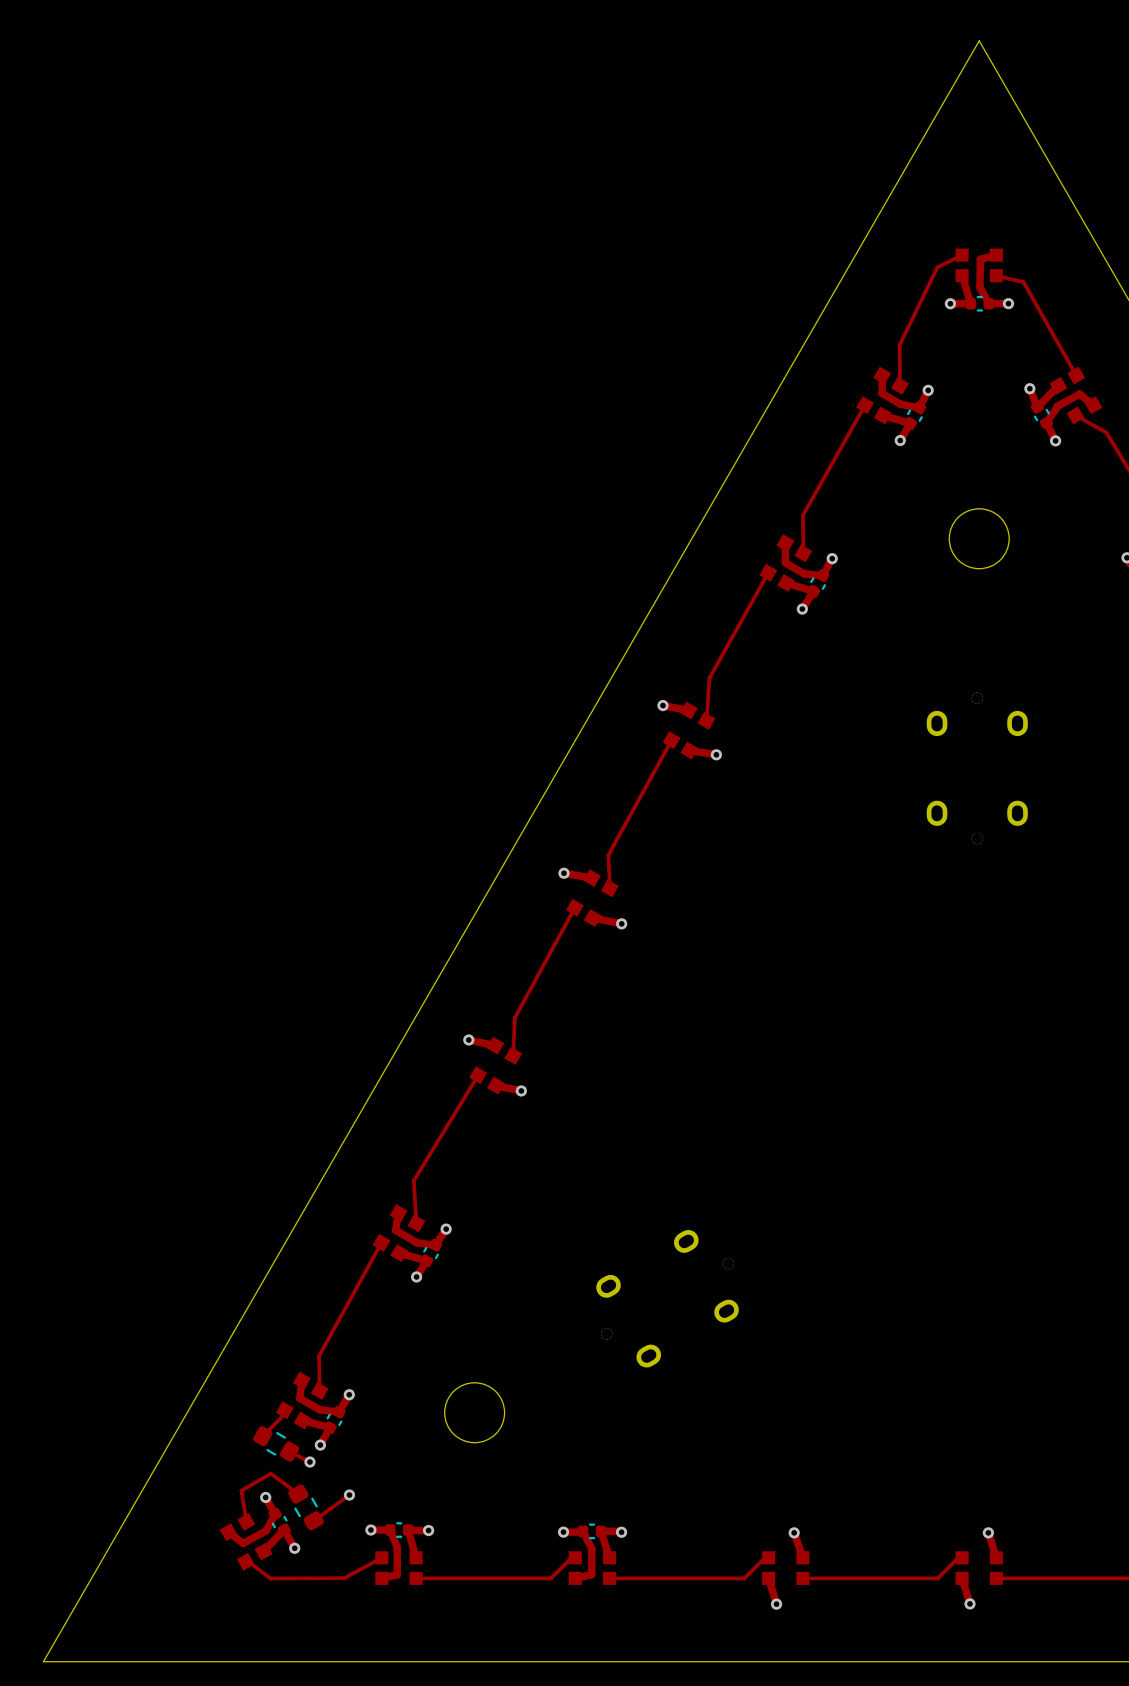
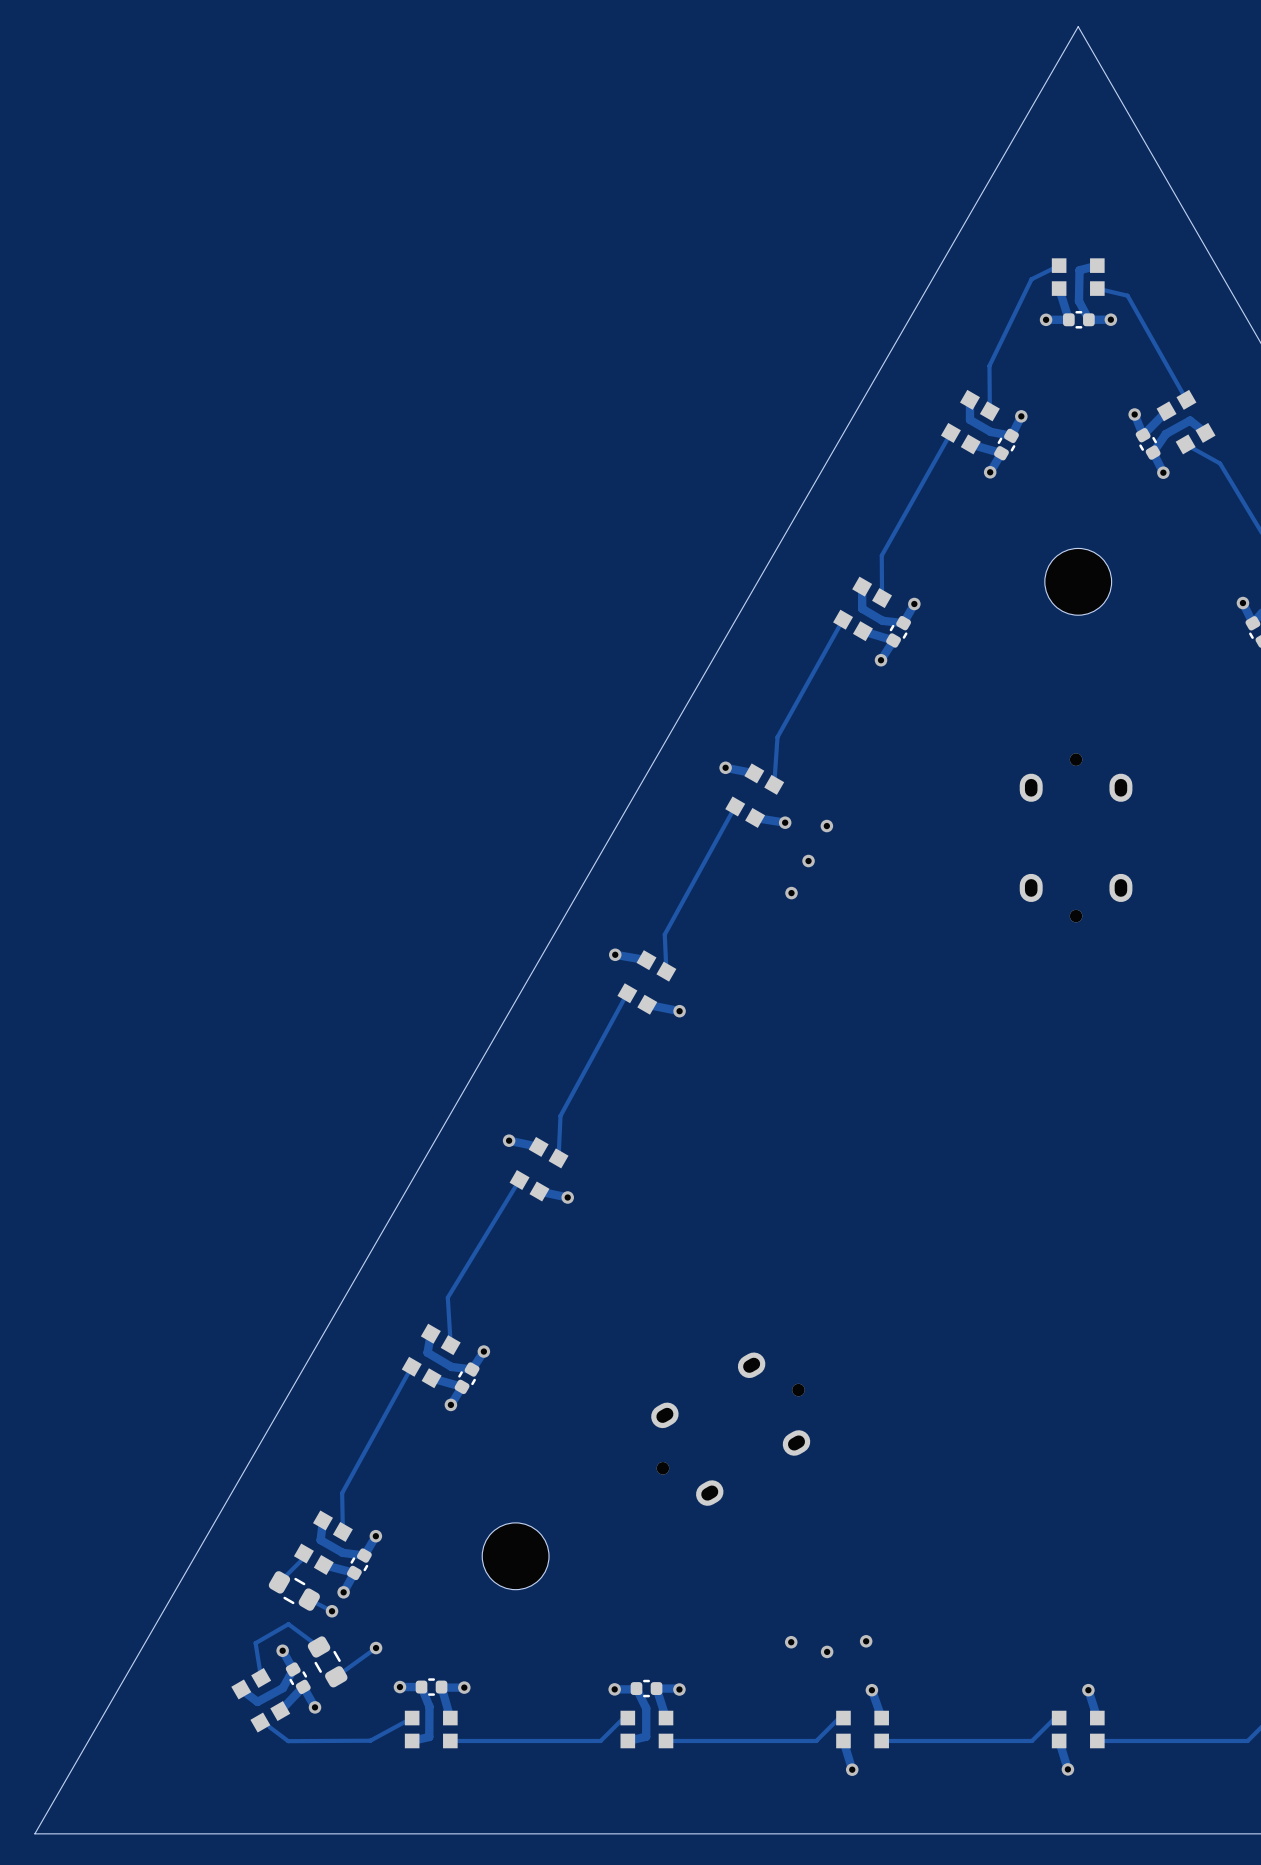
via: none -> (826, 826)
via: none -> (808, 861)
via: none -> (791, 893)
via: none -> (791, 1642)
via: none -> (866, 1641)
via: none -> (827, 1651)

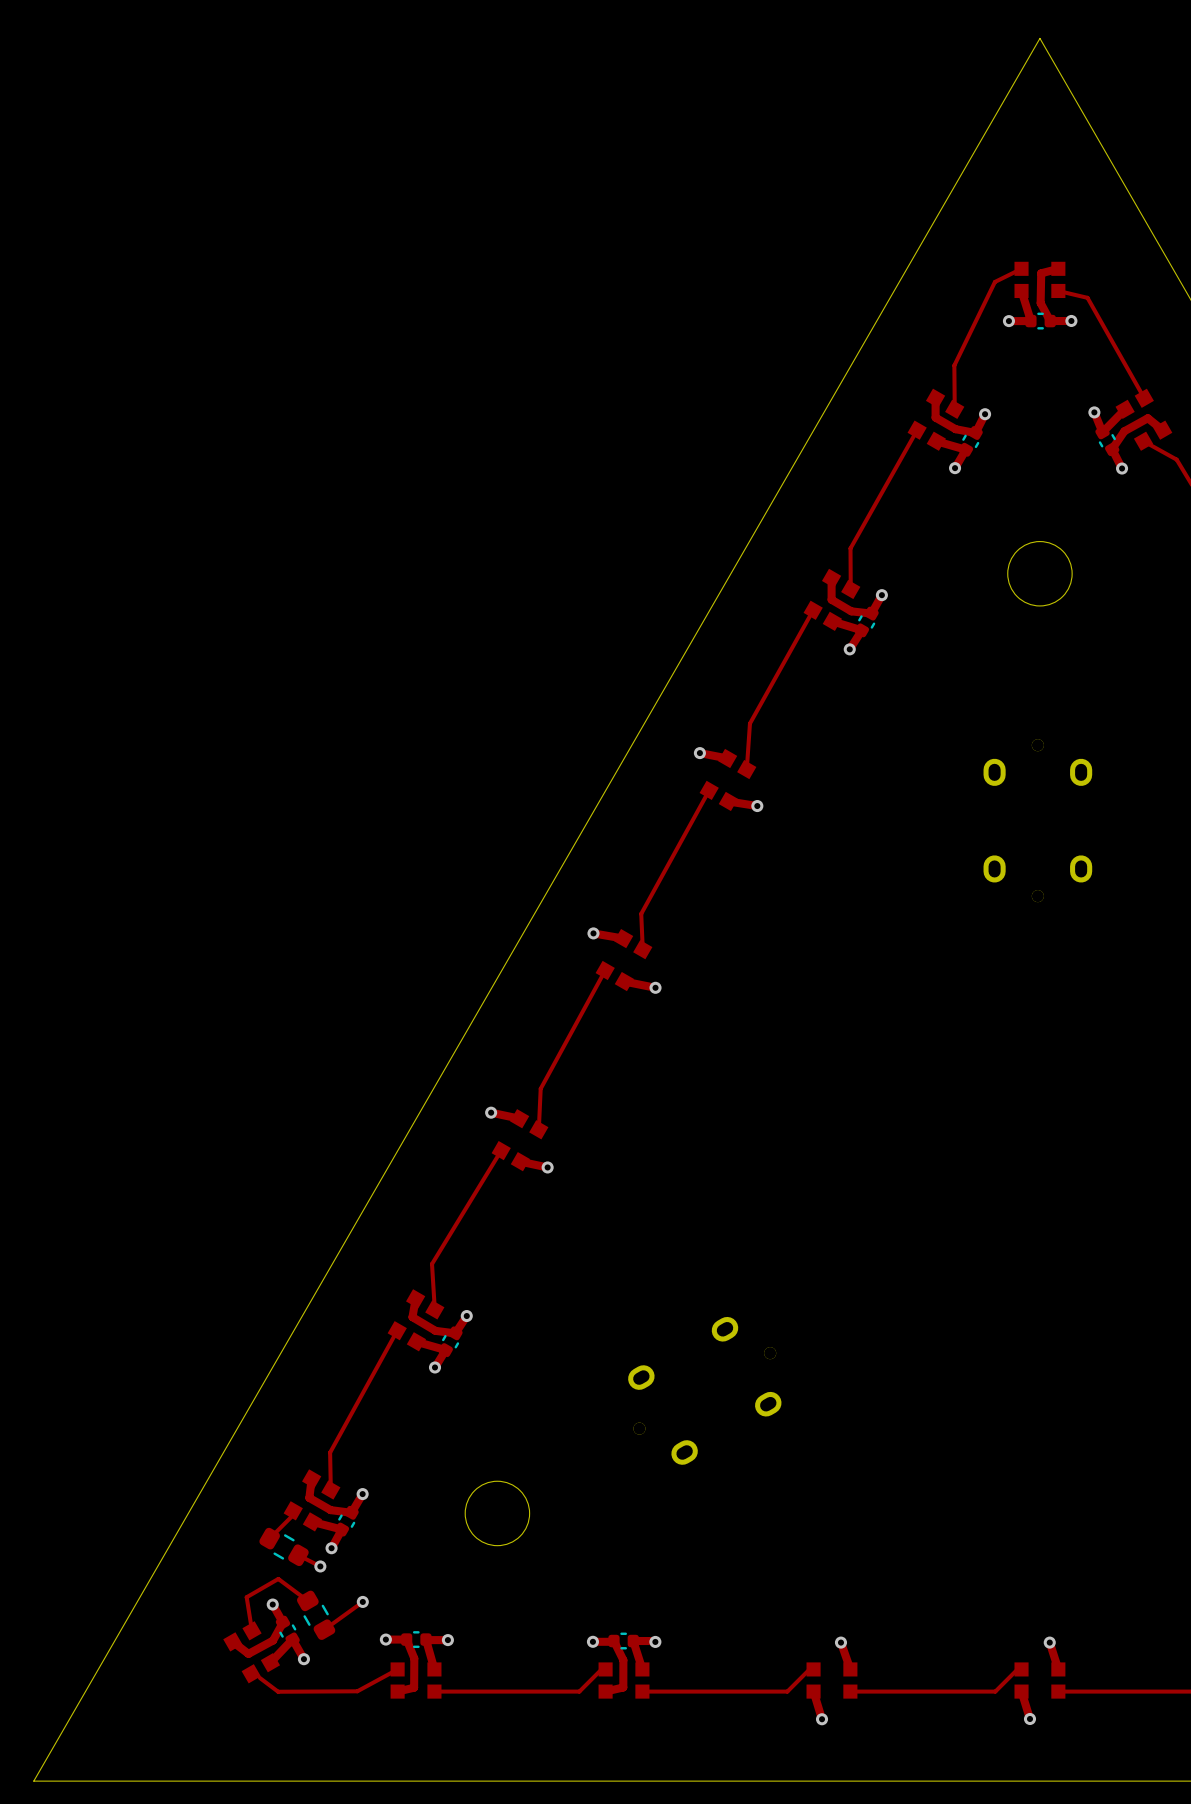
via: (826, 826) -> none
via: (808, 861) -> none
via: (791, 893) -> none
via: (866, 1641) -> none
via: (791, 1642) -> none
via: (827, 1651) -> none

